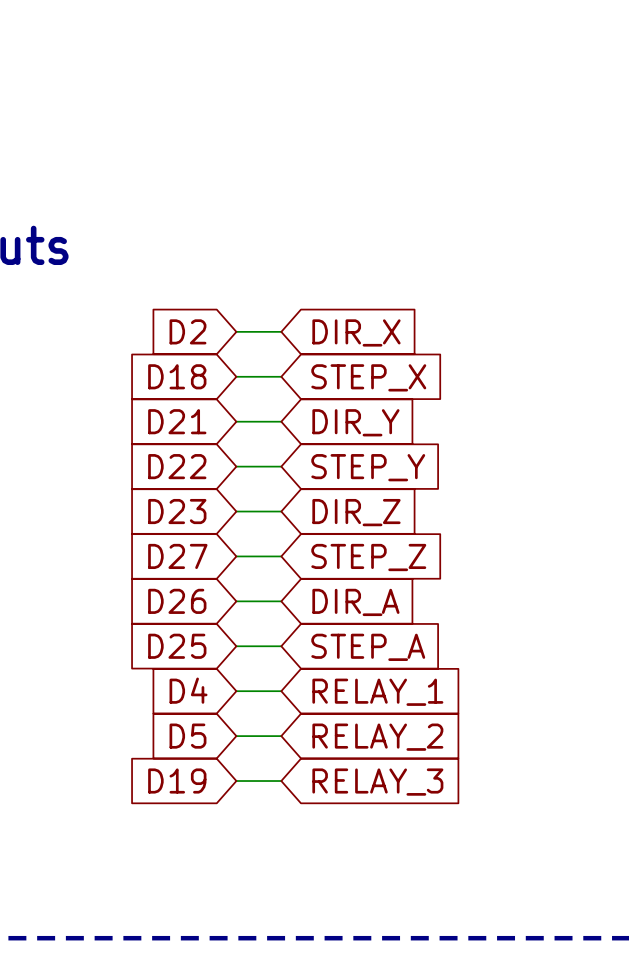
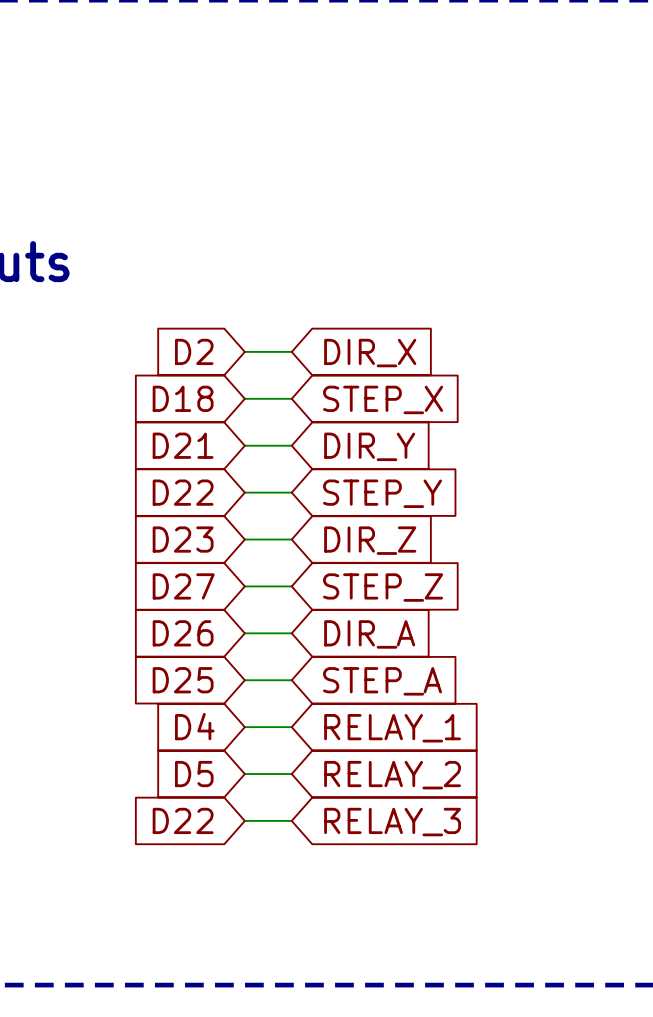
global label: D19 (177, 781) -> D22 (183, 820)

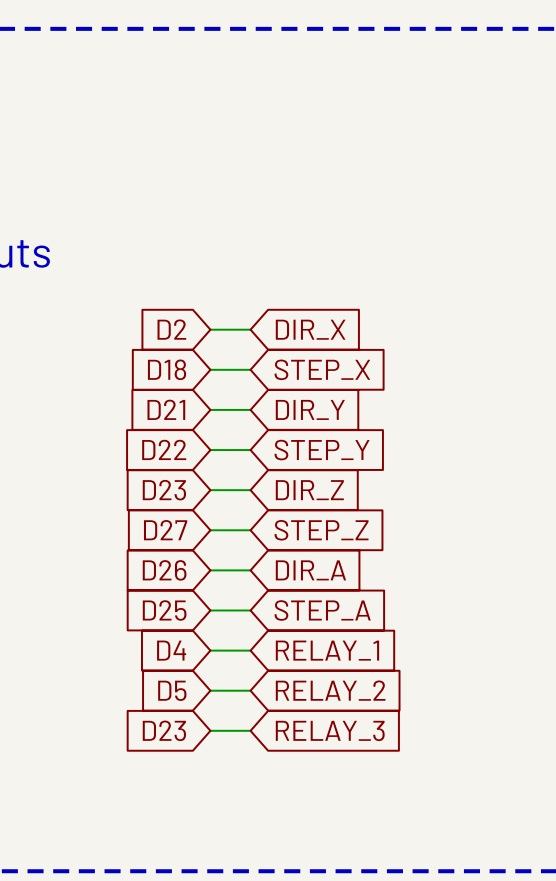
global label: D22 (183, 820) -> D23 (164, 730)

